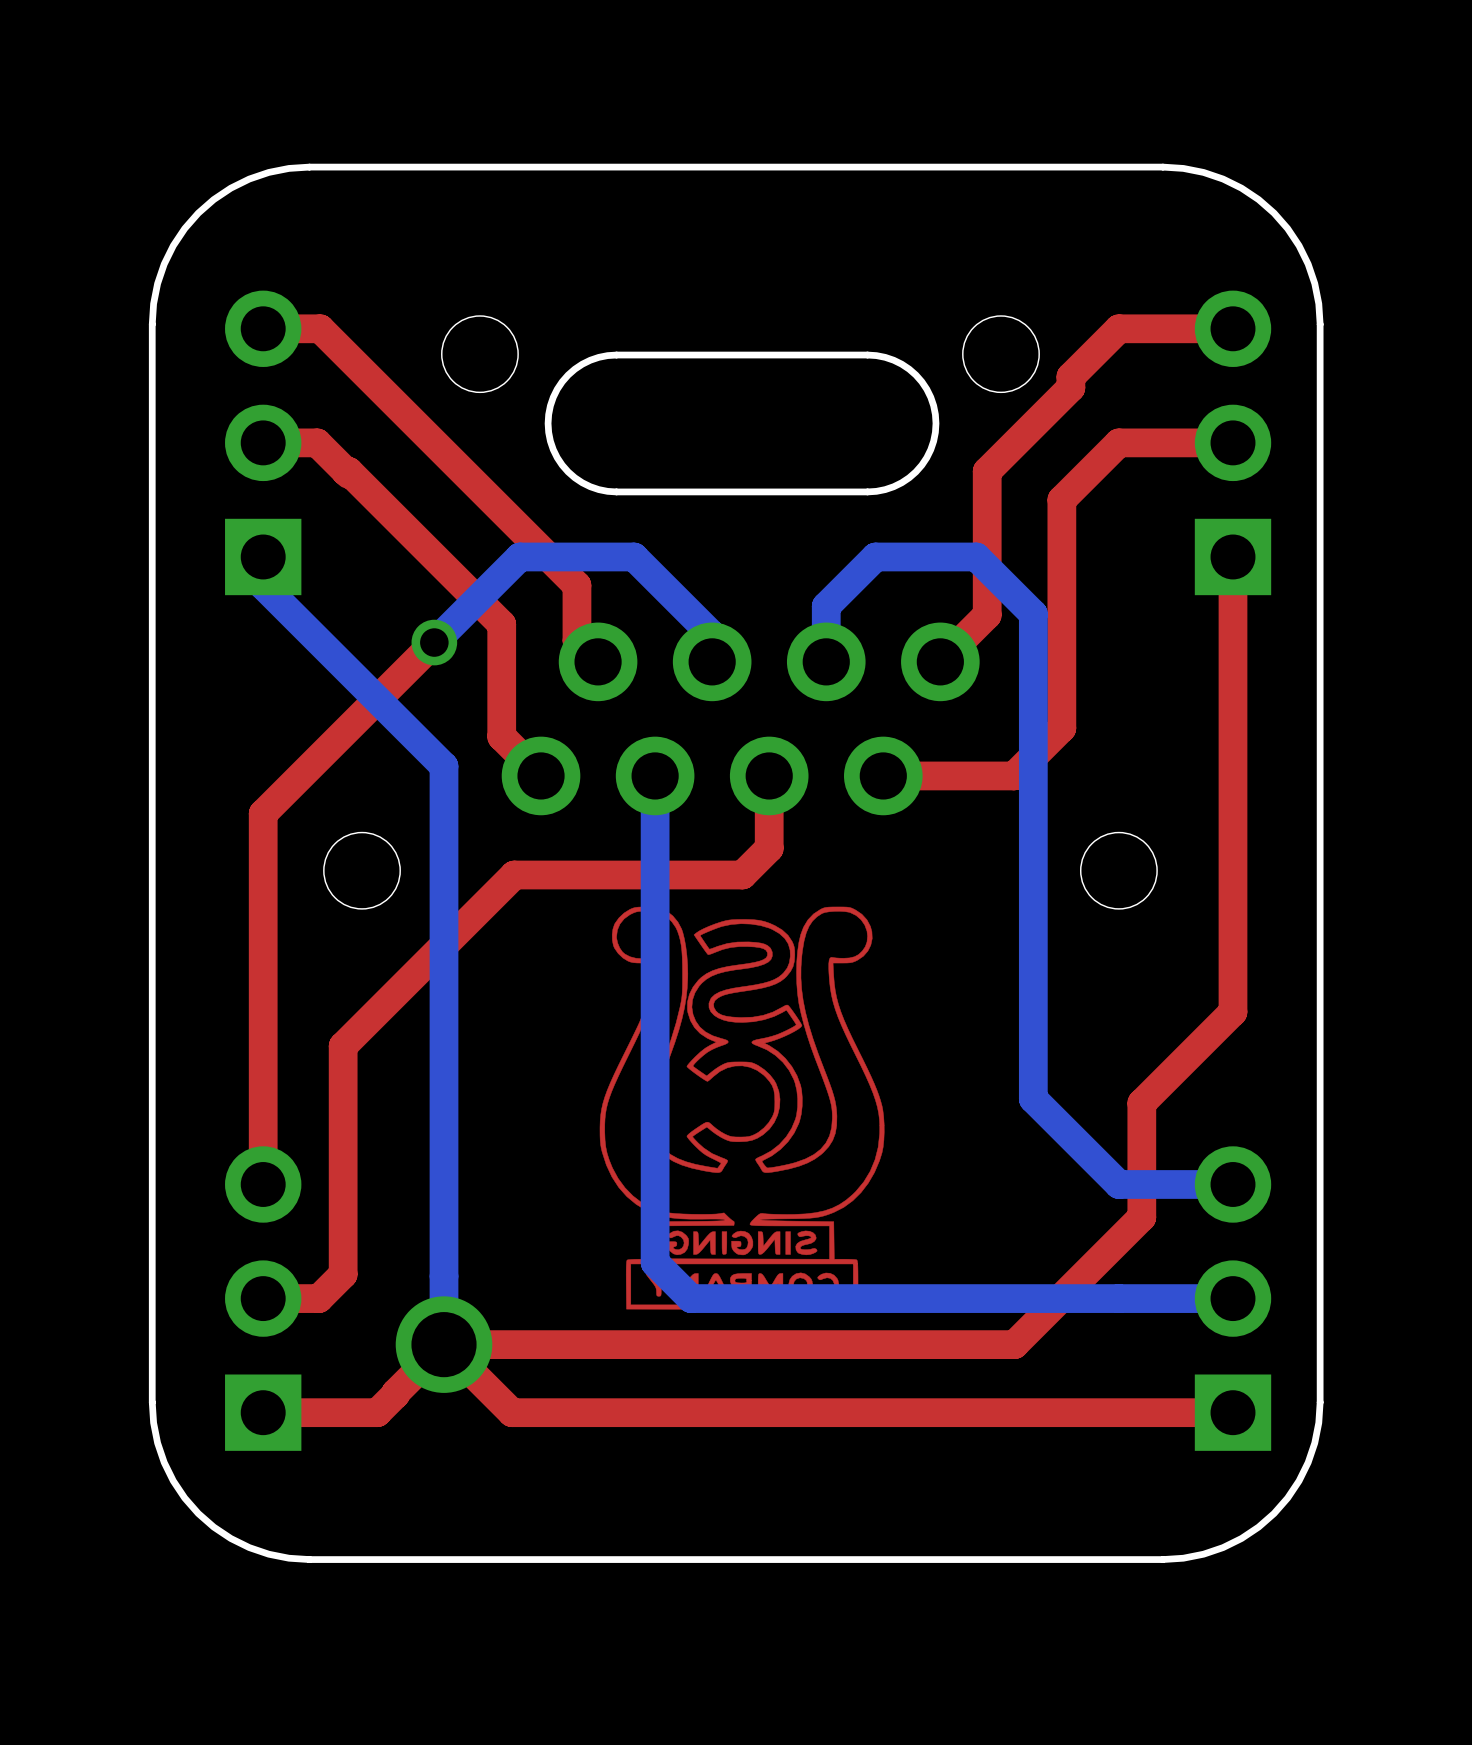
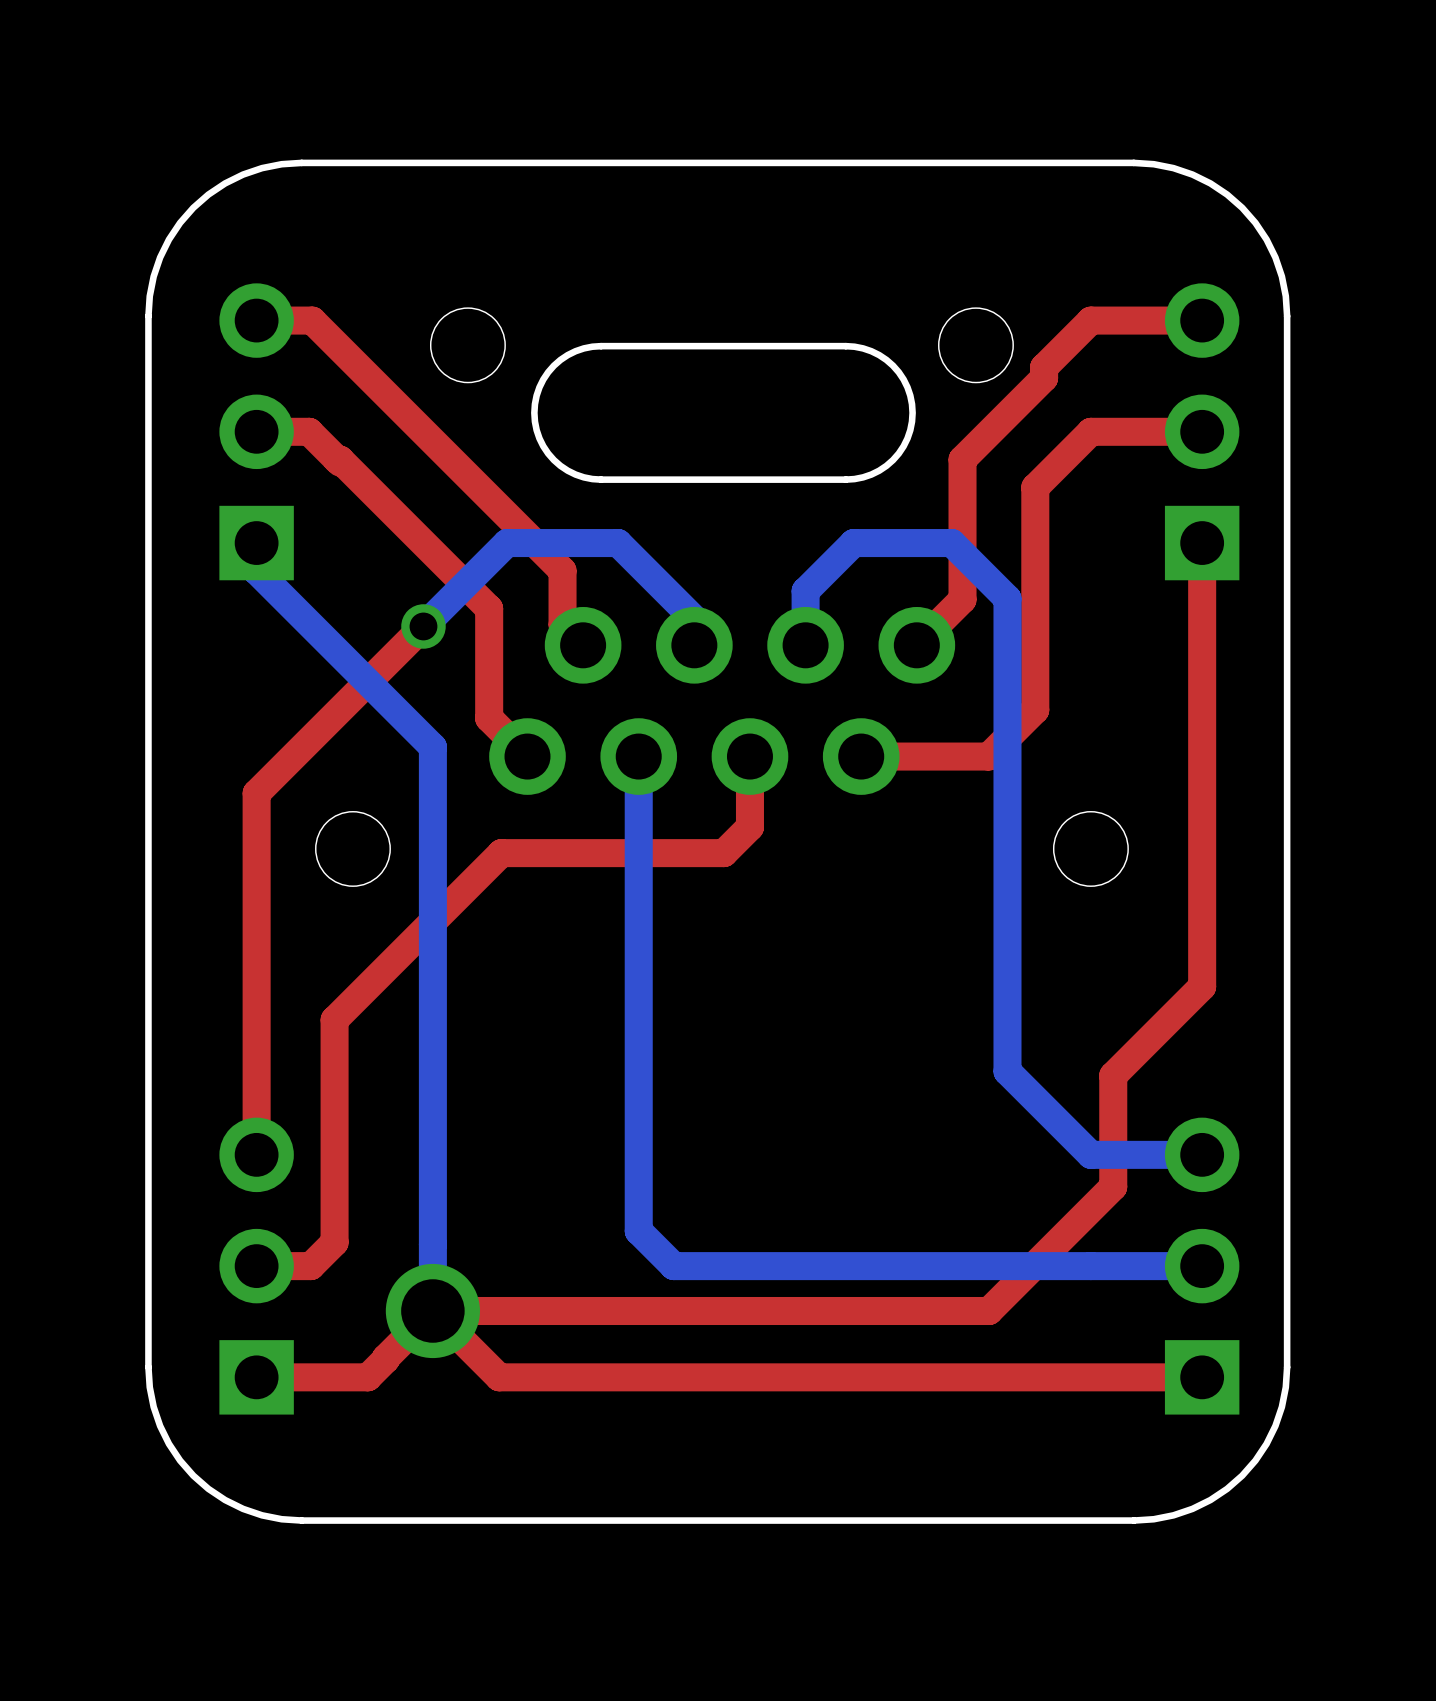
drawing: [599, 906, 885, 1310] -> none

